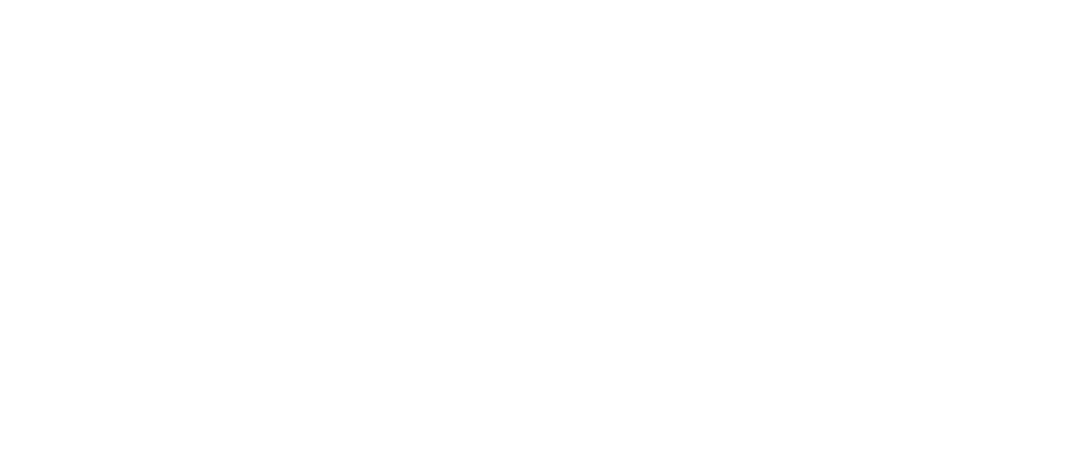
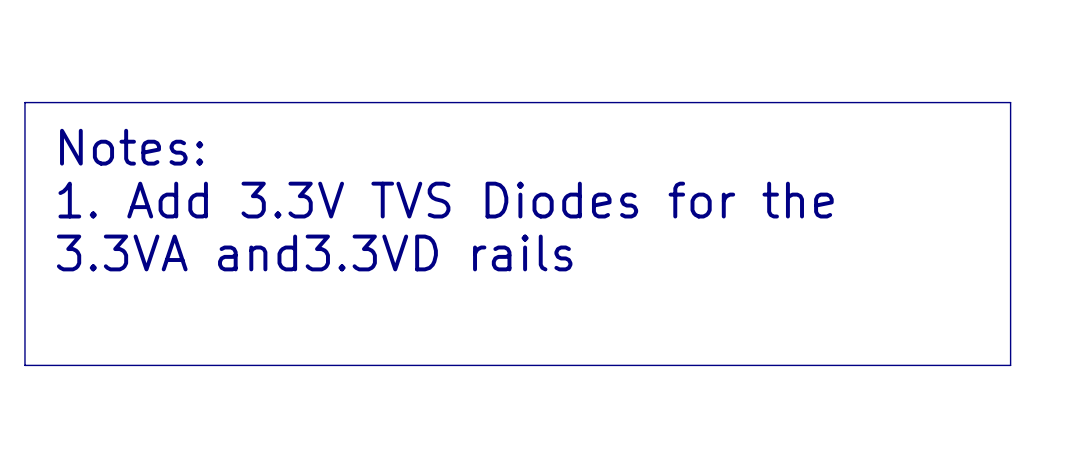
line: none -> (24, 102) (1010, 102) (1010, 365) (24, 365) (24, 102)
text: none -> Notes: (131, 147)
text: none -> 1. Add 3.3V TVS Diodes for the (446, 200)
text: none -> 3.3VA and3.3VD rails (314, 252)

